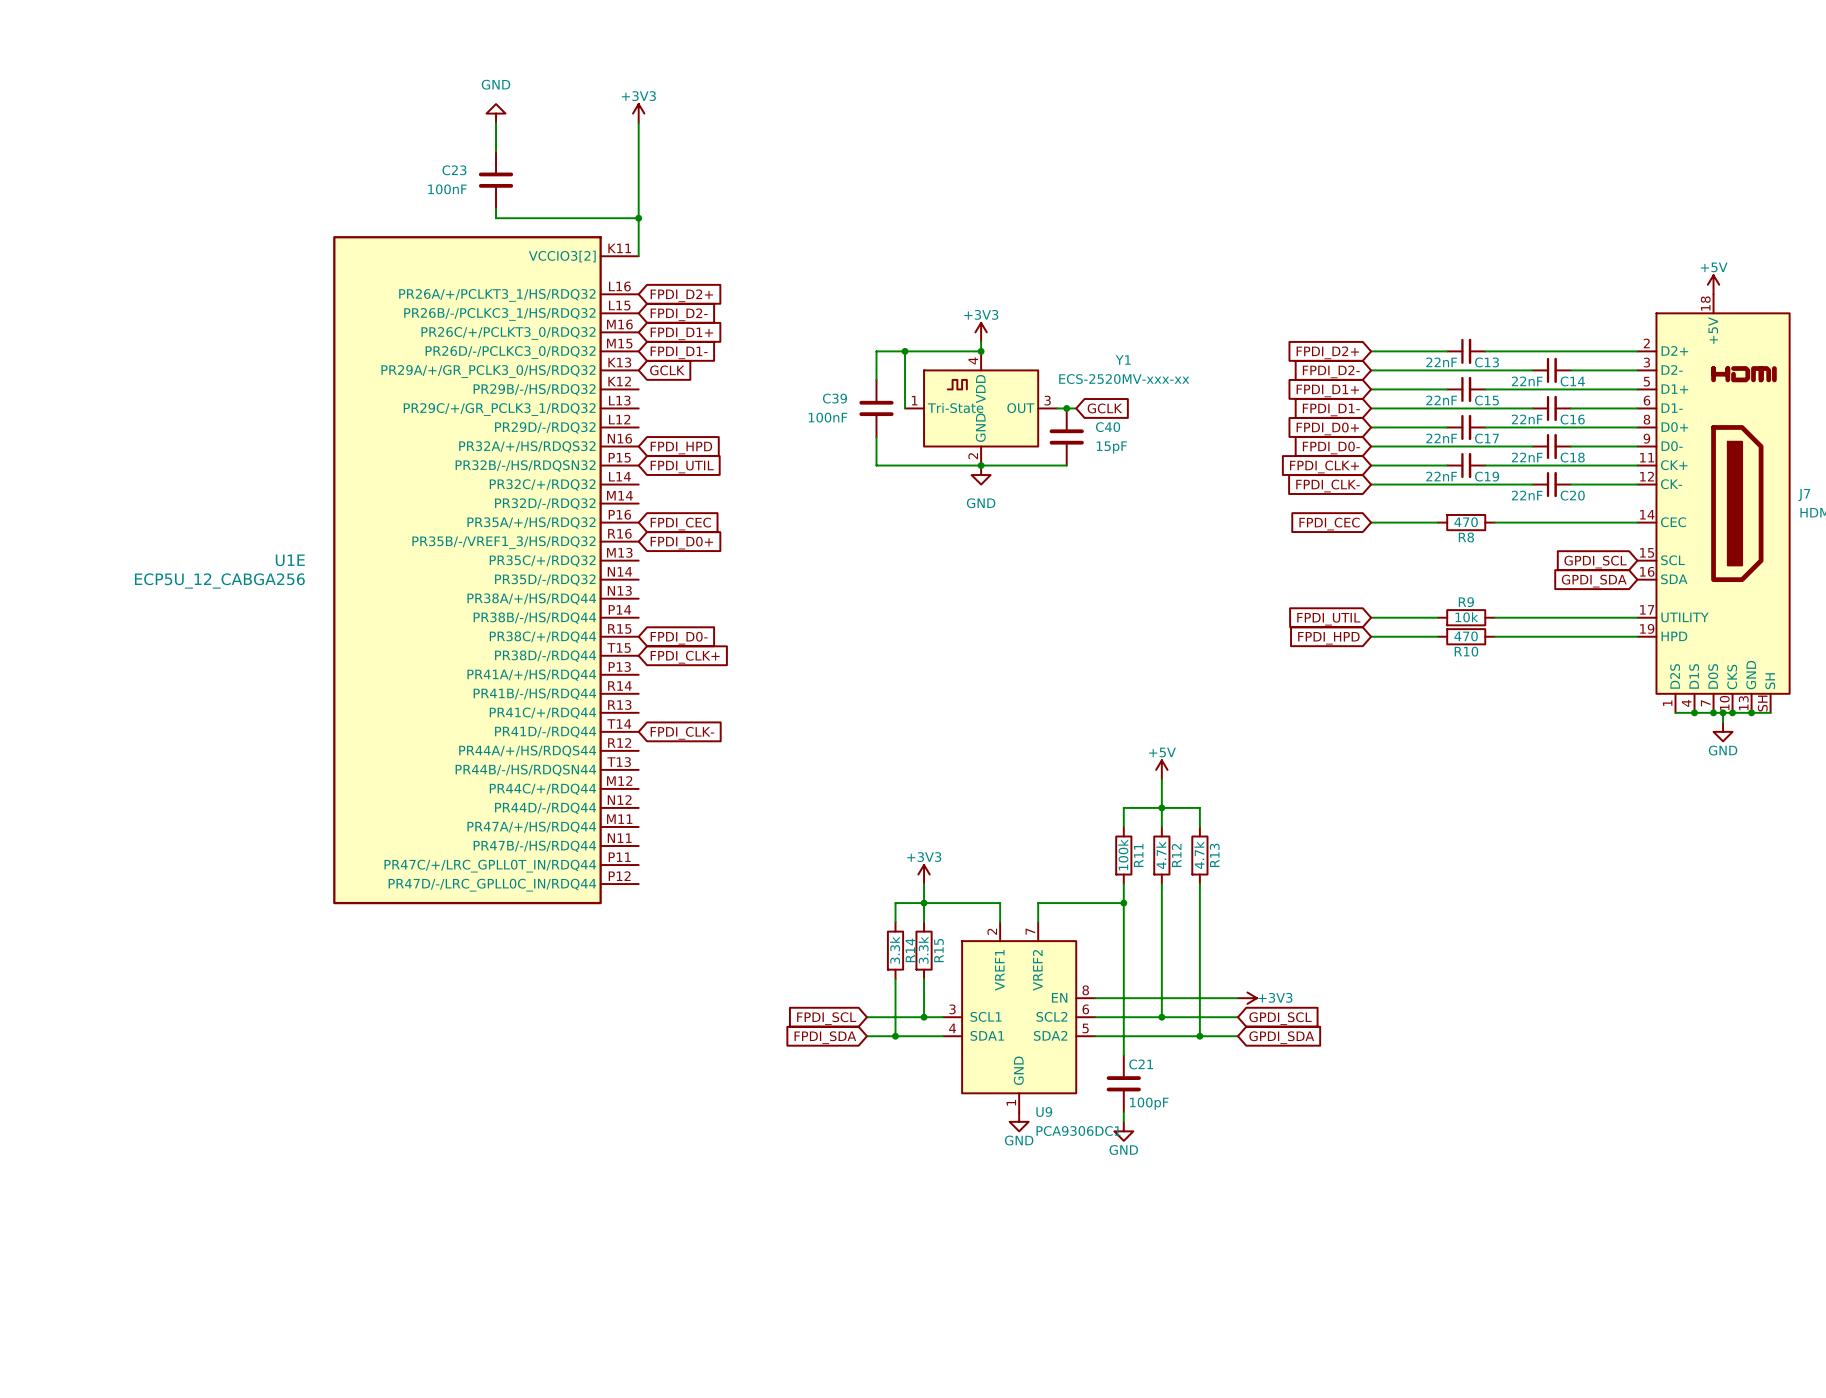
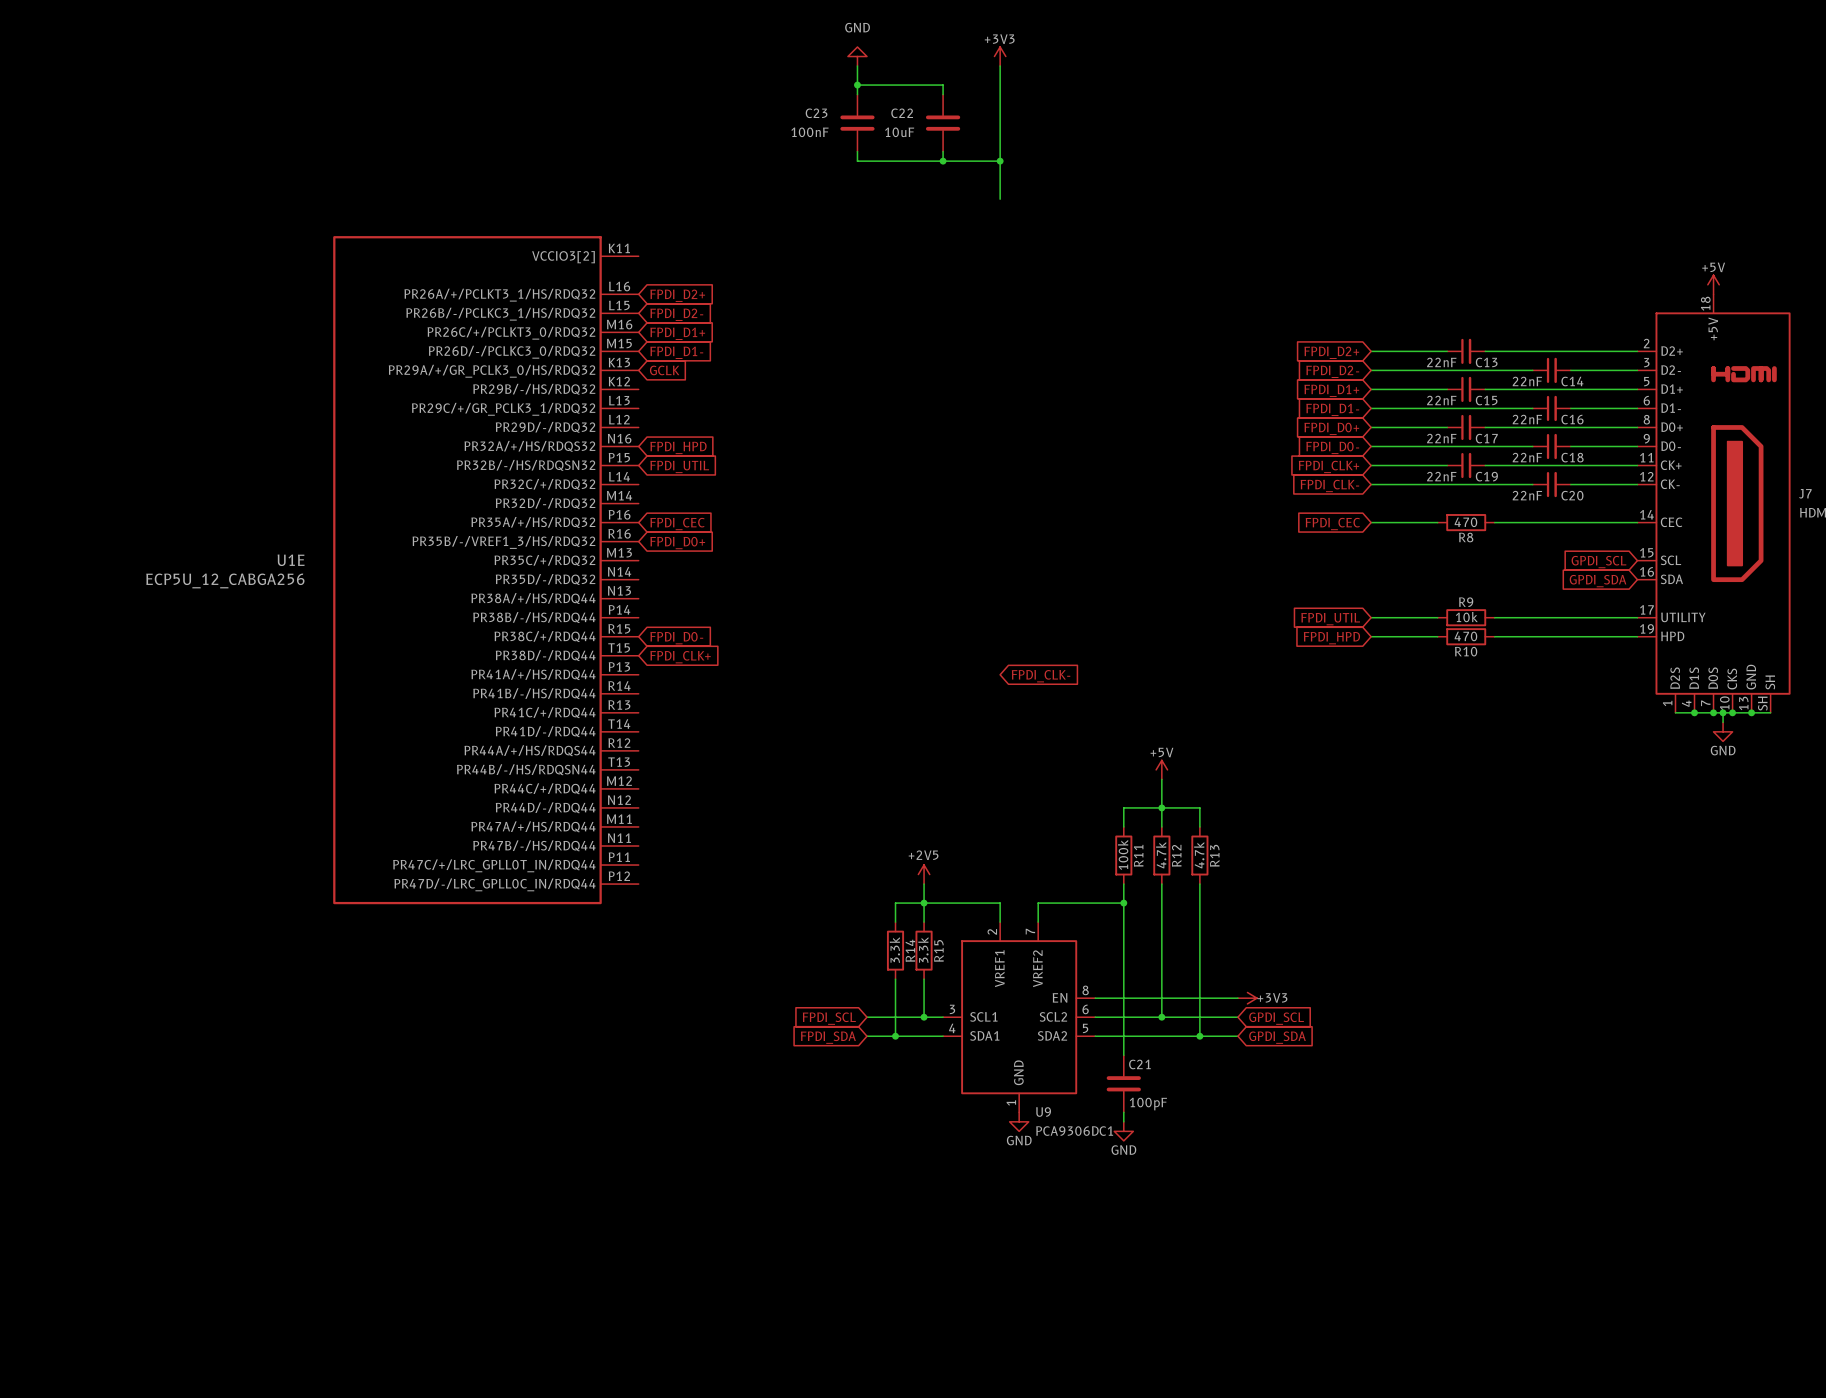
power symbol: none -> GND (857, 56)
power symbol: none -> +3V3 (1000, 56)
wire: none -> (857, 66) (857, 94)
wire: none -> (1000, 66) (1000, 199)
wire: none -> (857, 85) (943, 85) (943, 94)
junction: none -> (857, 85)
power symbol: GND (496, 113) -> none
power symbol: +3V3 (638, 113) -> none
wire: (496, 123) (496, 151) -> none
wire: (638, 123) (638, 256) -> none
C22: none -> 10uF (943, 123)
wire: none -> (857, 151) (857, 161) (1000, 161)
wire: none -> (943, 151) (943, 161)
junction: none -> (943, 161)
junction: none -> (1000, 161)
C23 position: (496, 180) -> (857, 123)
wire: (496, 208) (496, 218) (638, 218) -> none
junction: (638, 218) -> none
power symbol: +3V3 (981, 332) -> none
wire: (981, 341) (981, 351) (876, 351) (876, 379) -> none
wire: (905, 351) (905, 408) -> none
junction: (905, 351) -> none
junction: (981, 351) -> none
C39: 100nF (876, 408) -> none
Y1: ECS-2520MV-xxx-xx (981, 408) -> none
wire: (1057, 408) (1076, 408) -> none
junction: (1066, 408) -> none
global label: GCLK (1104, 408) -> none
wire: (876, 436) (876, 465) (1066, 465) -> none
C40: 15pF (1066, 436) -> none
junction: (981, 465) -> none
power symbol: GND (981, 475) -> none
global label: none -> FPDI_CLK- (1041, 676)
global label: FPDI_CLK- (682, 733) -> none
power symbol: +3V3 (924, 874) -> +2V5 (924, 874)

